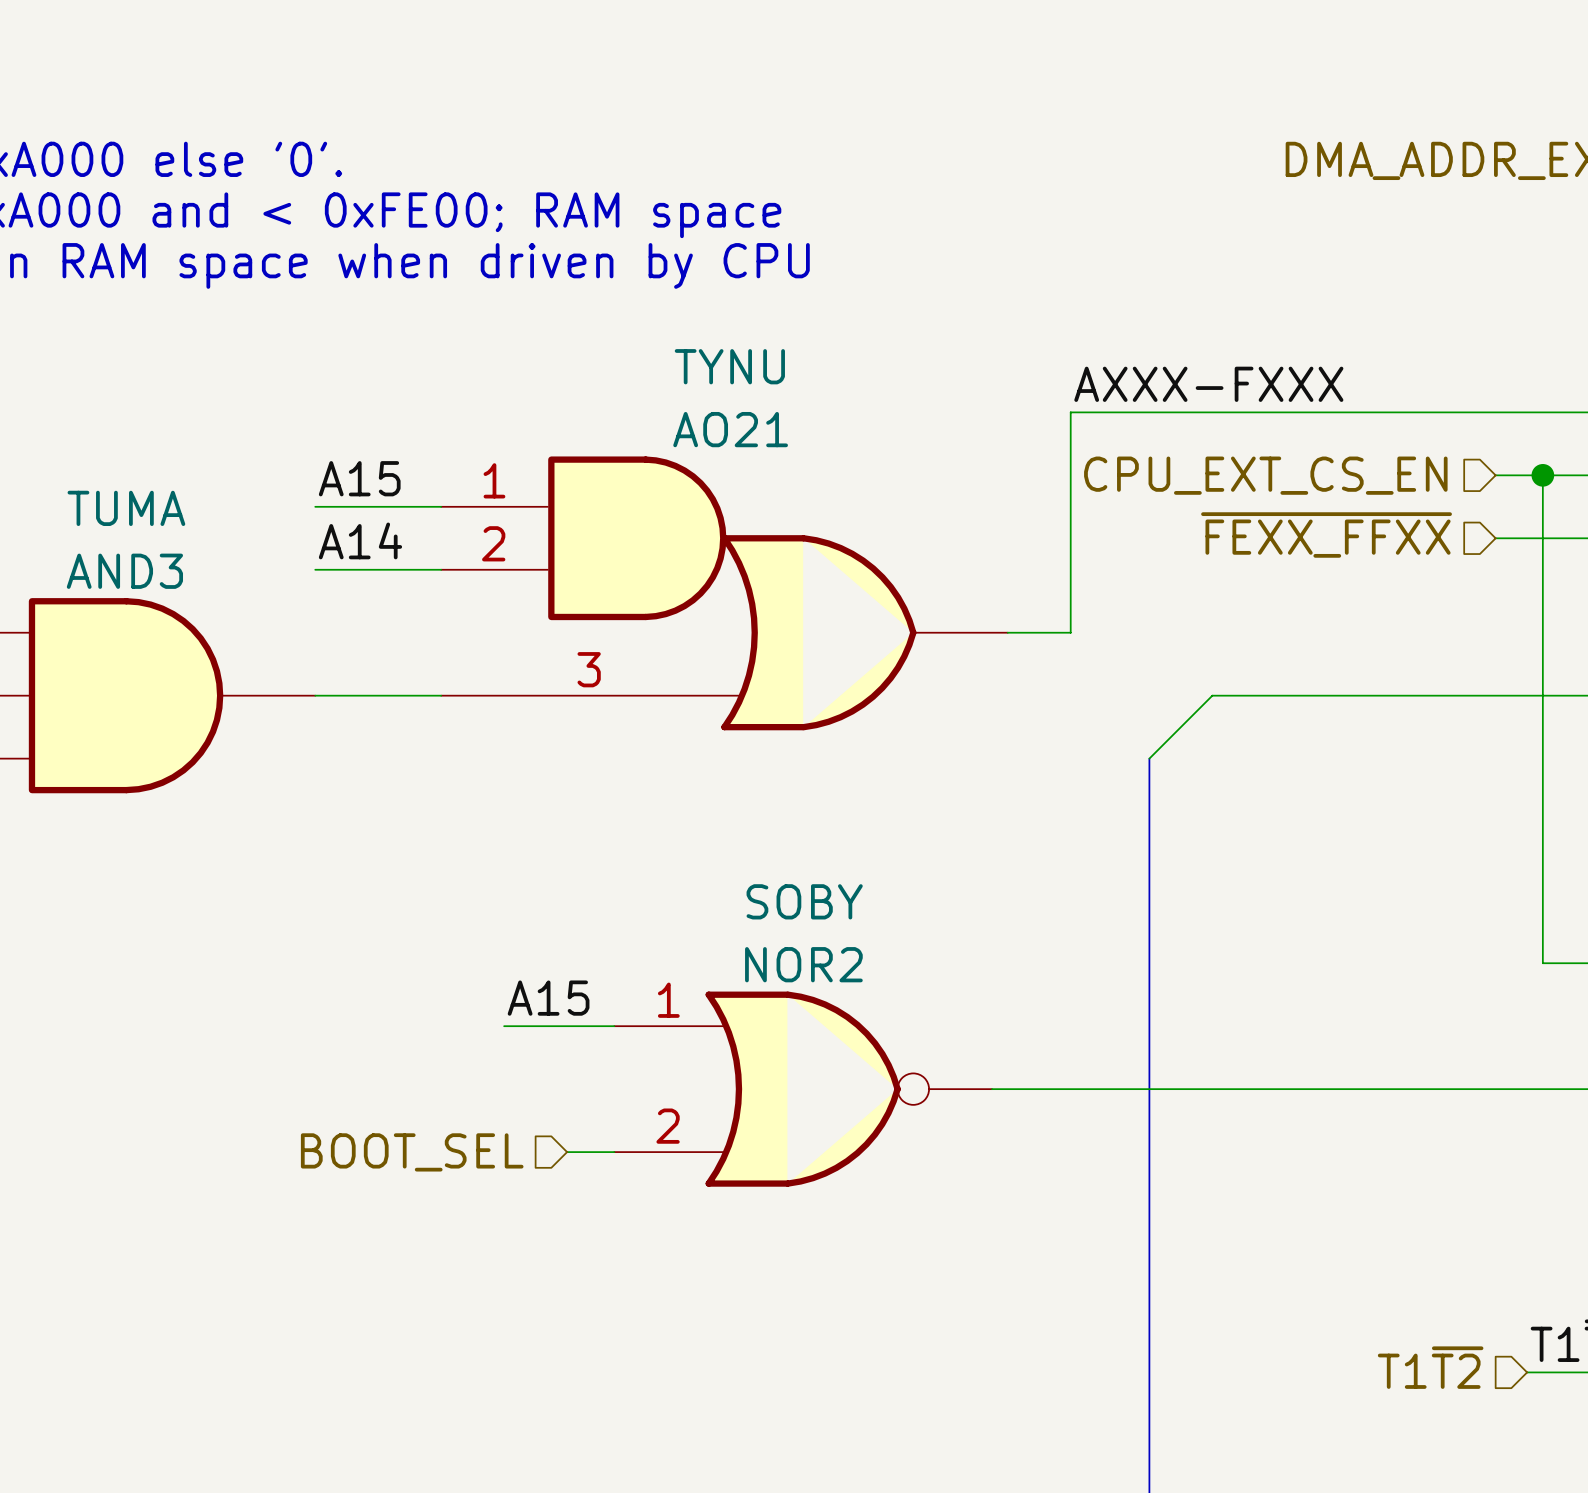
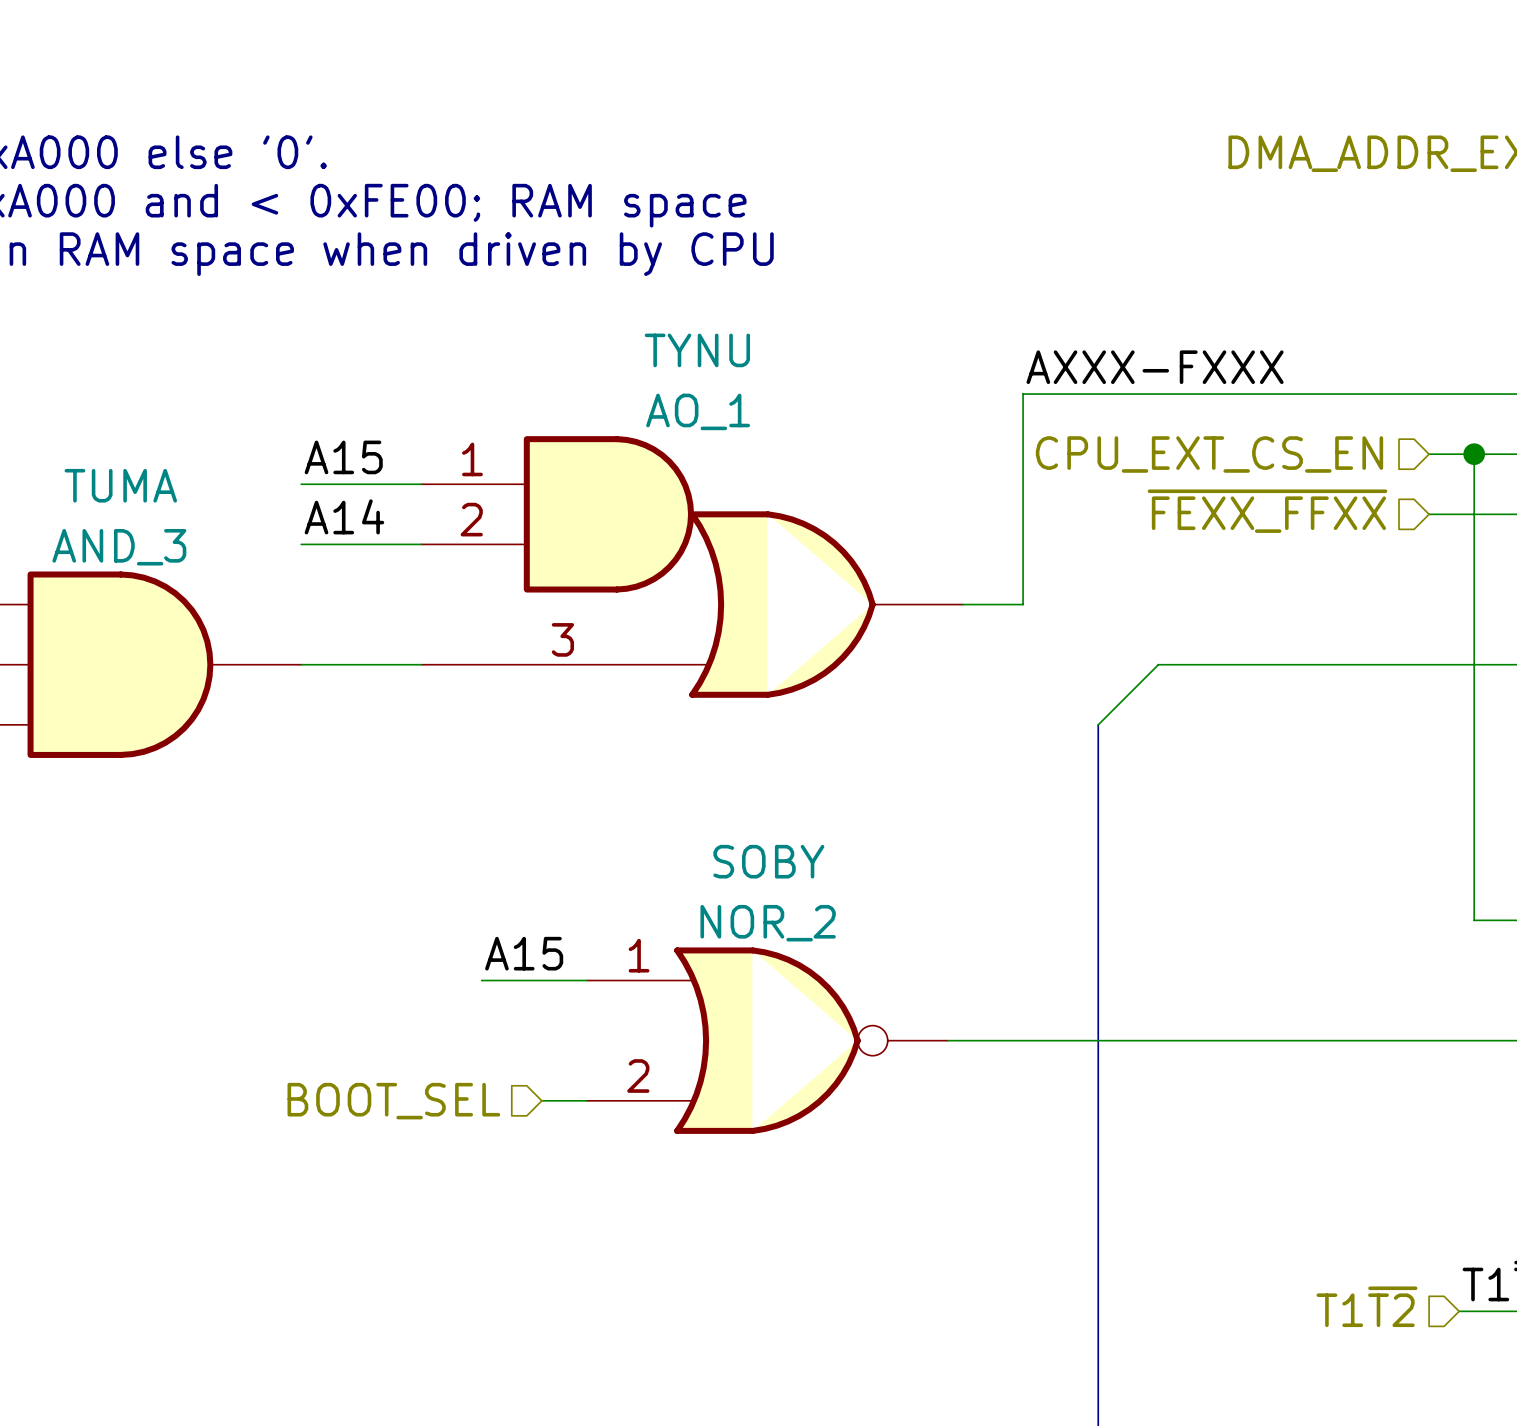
TYNU value: AO21 (730, 429) -> AO_1 (698, 411)
TUMA value: AND3 (124, 571) -> AND_3 (119, 547)
SOBY value: NOR2 (803, 964) -> NOR_2 (768, 923)

